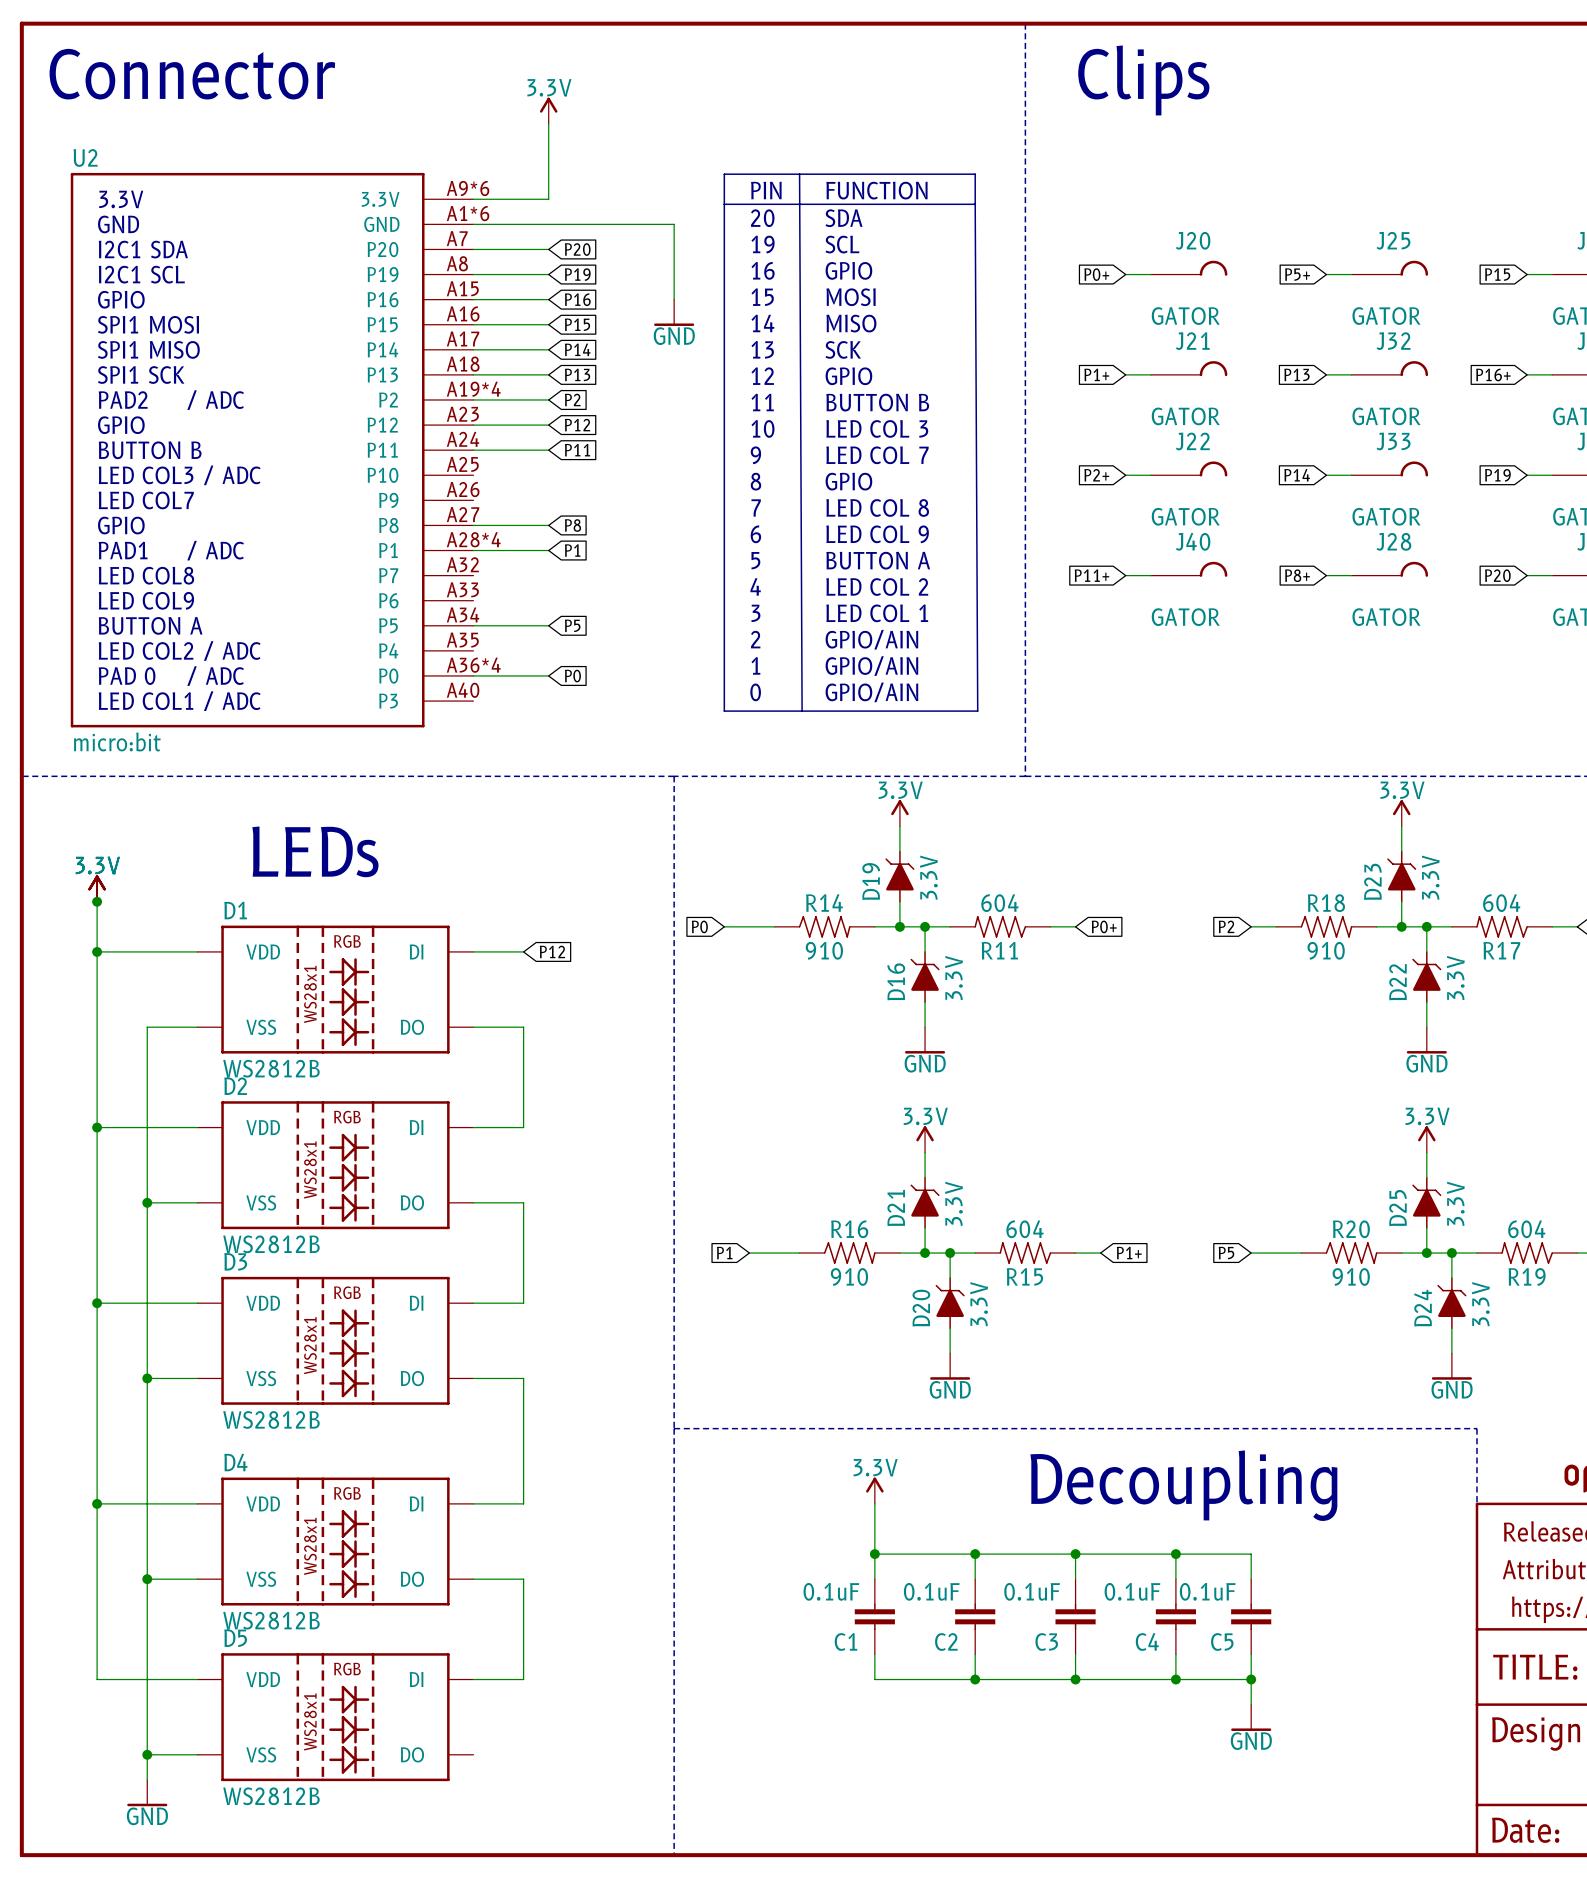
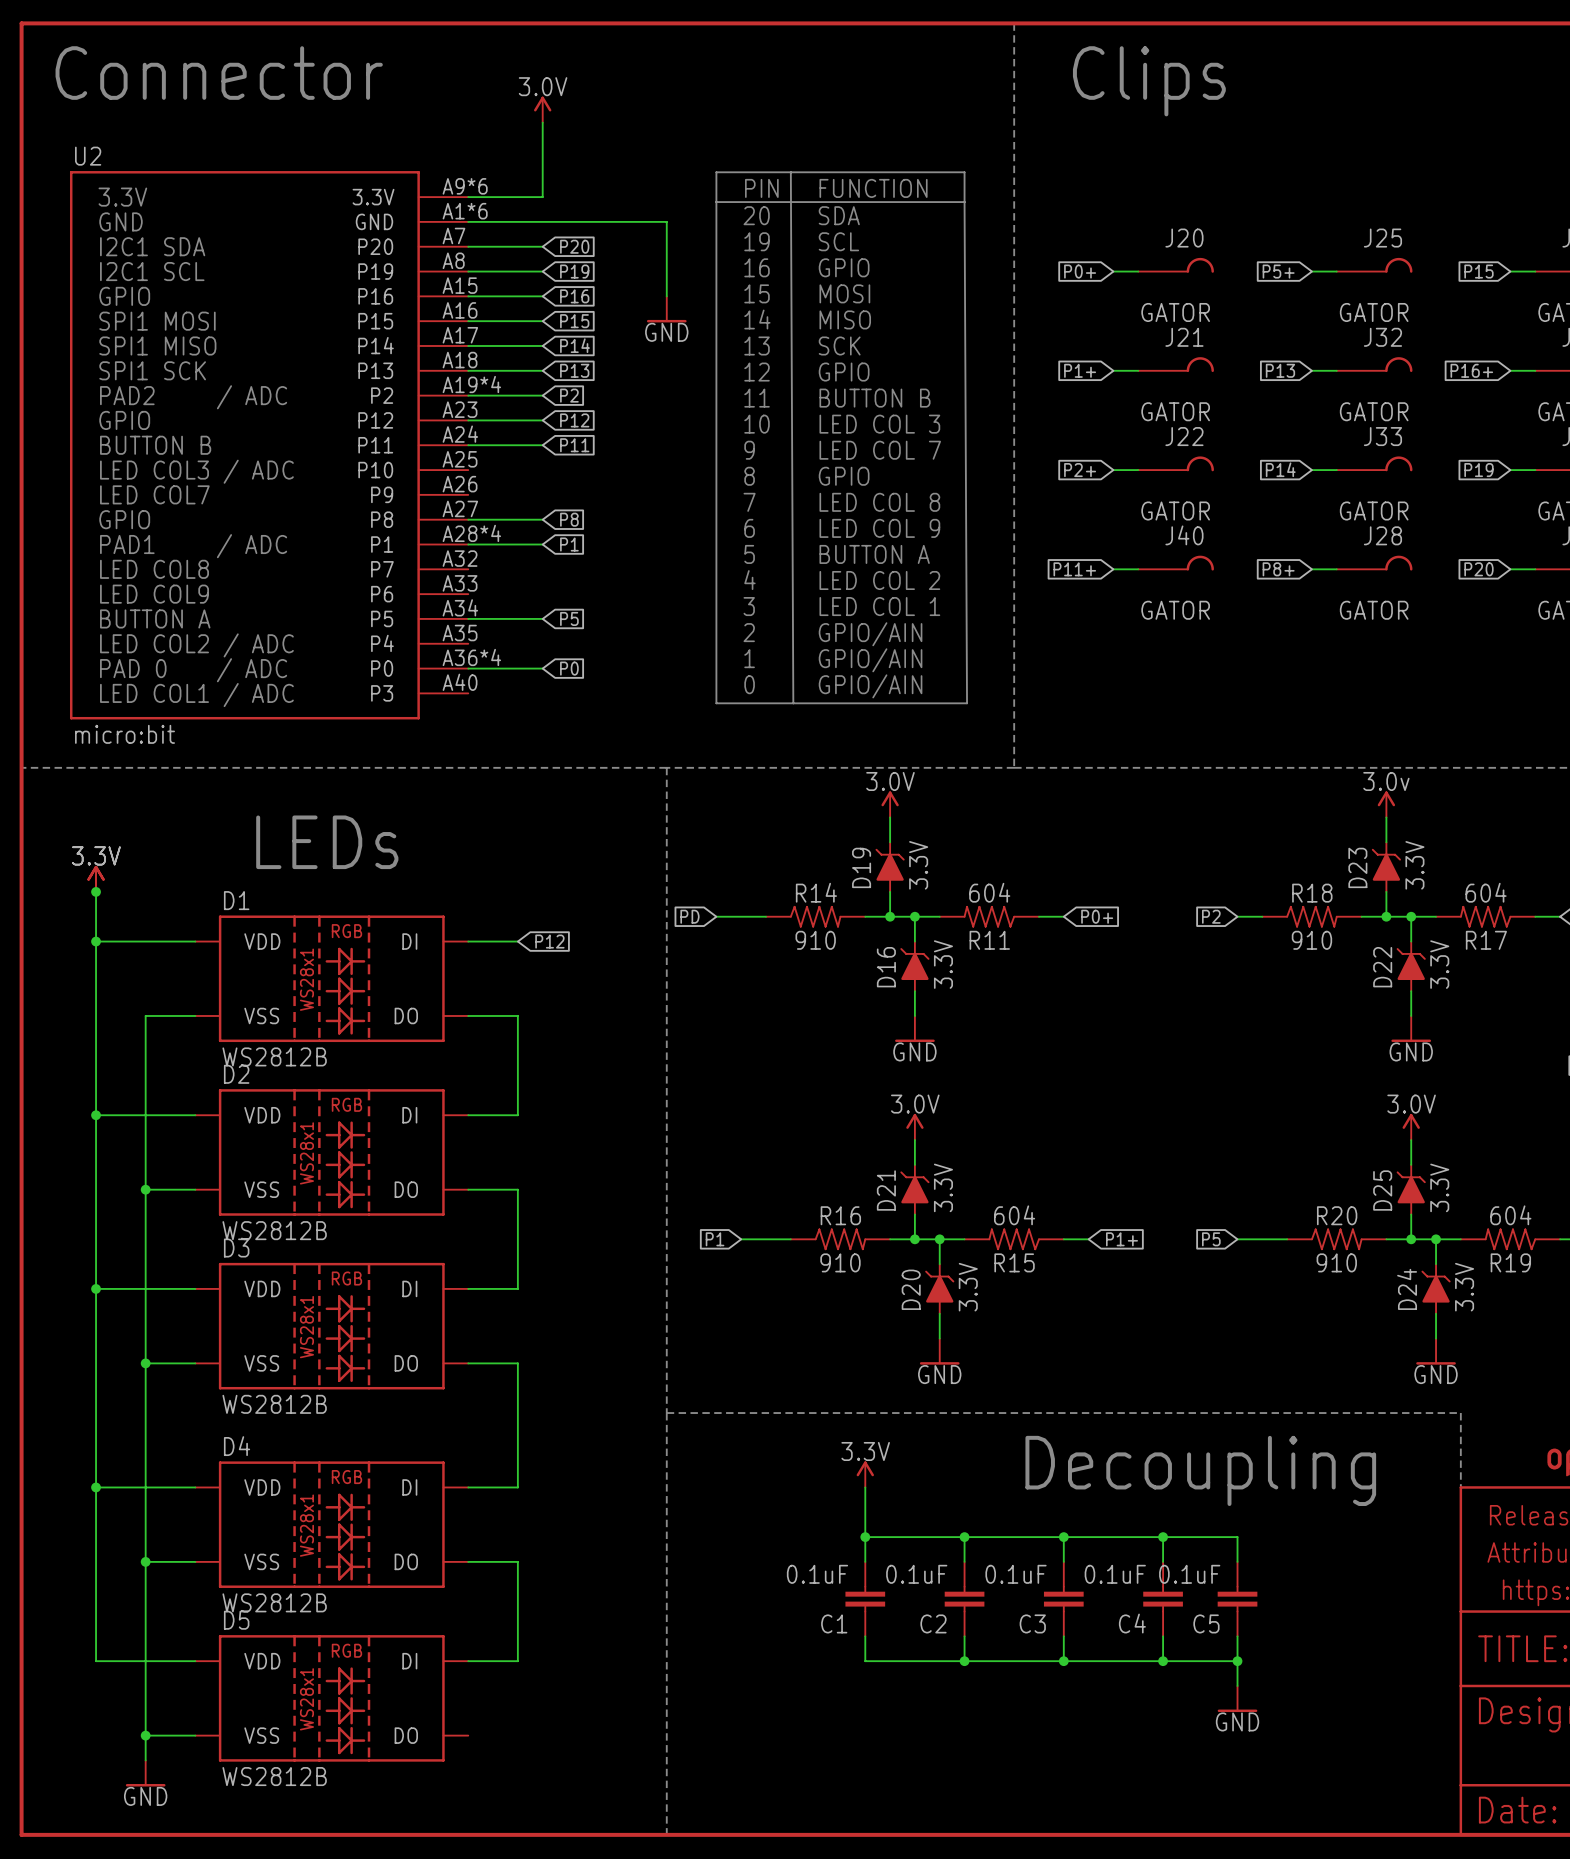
power symbol: 3.3V (548, 110) -> 3.0V (542, 109)
power symbol: 3.3V (899, 813) -> 3.0V (890, 804)
power symbol: 3.3V (1401, 813) -> 3.0v (1386, 804)
global label: P0 (699, 926) -> PD (689, 916)
power symbol: 3.3V (925, 1139) -> 3.0V (914, 1127)
power symbol: 3.3V (1426, 1139) -> 3.0V (1411, 1127)

